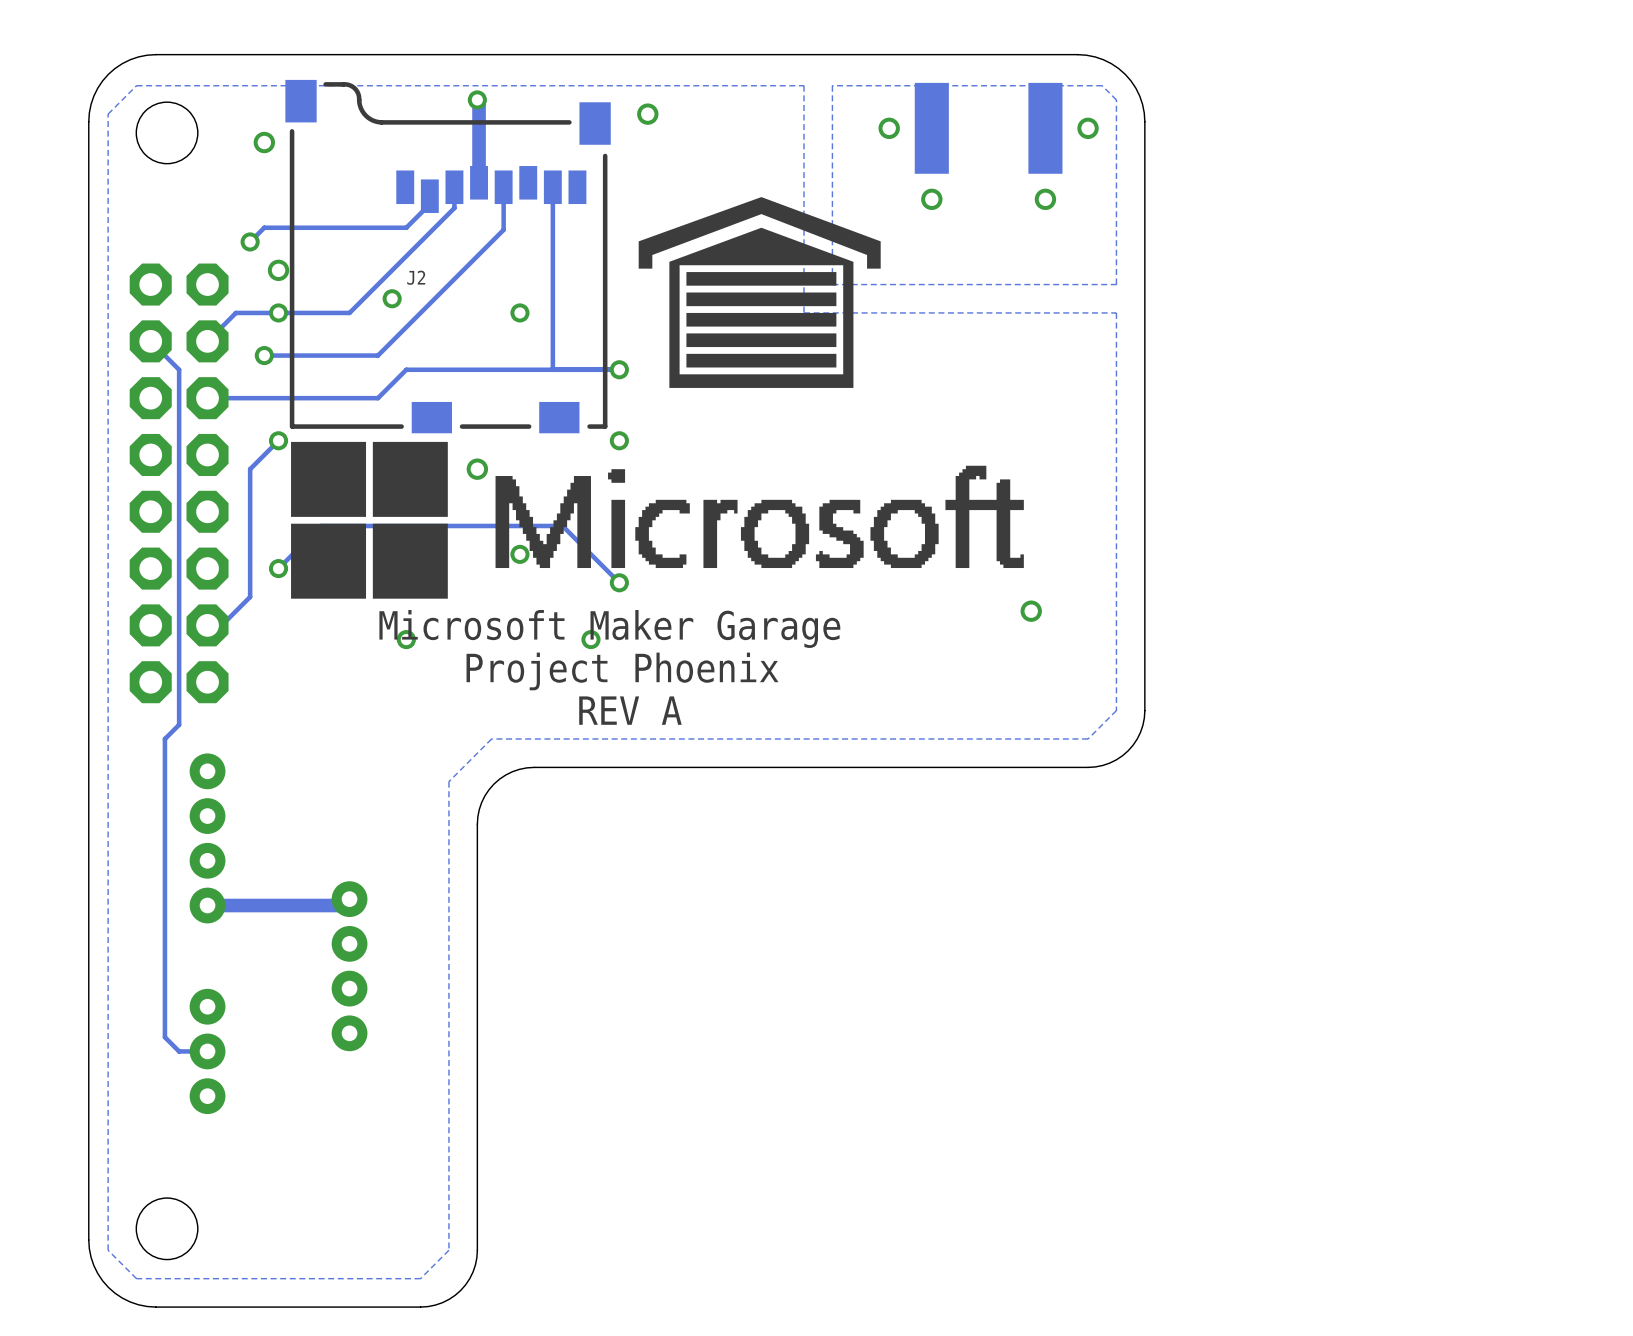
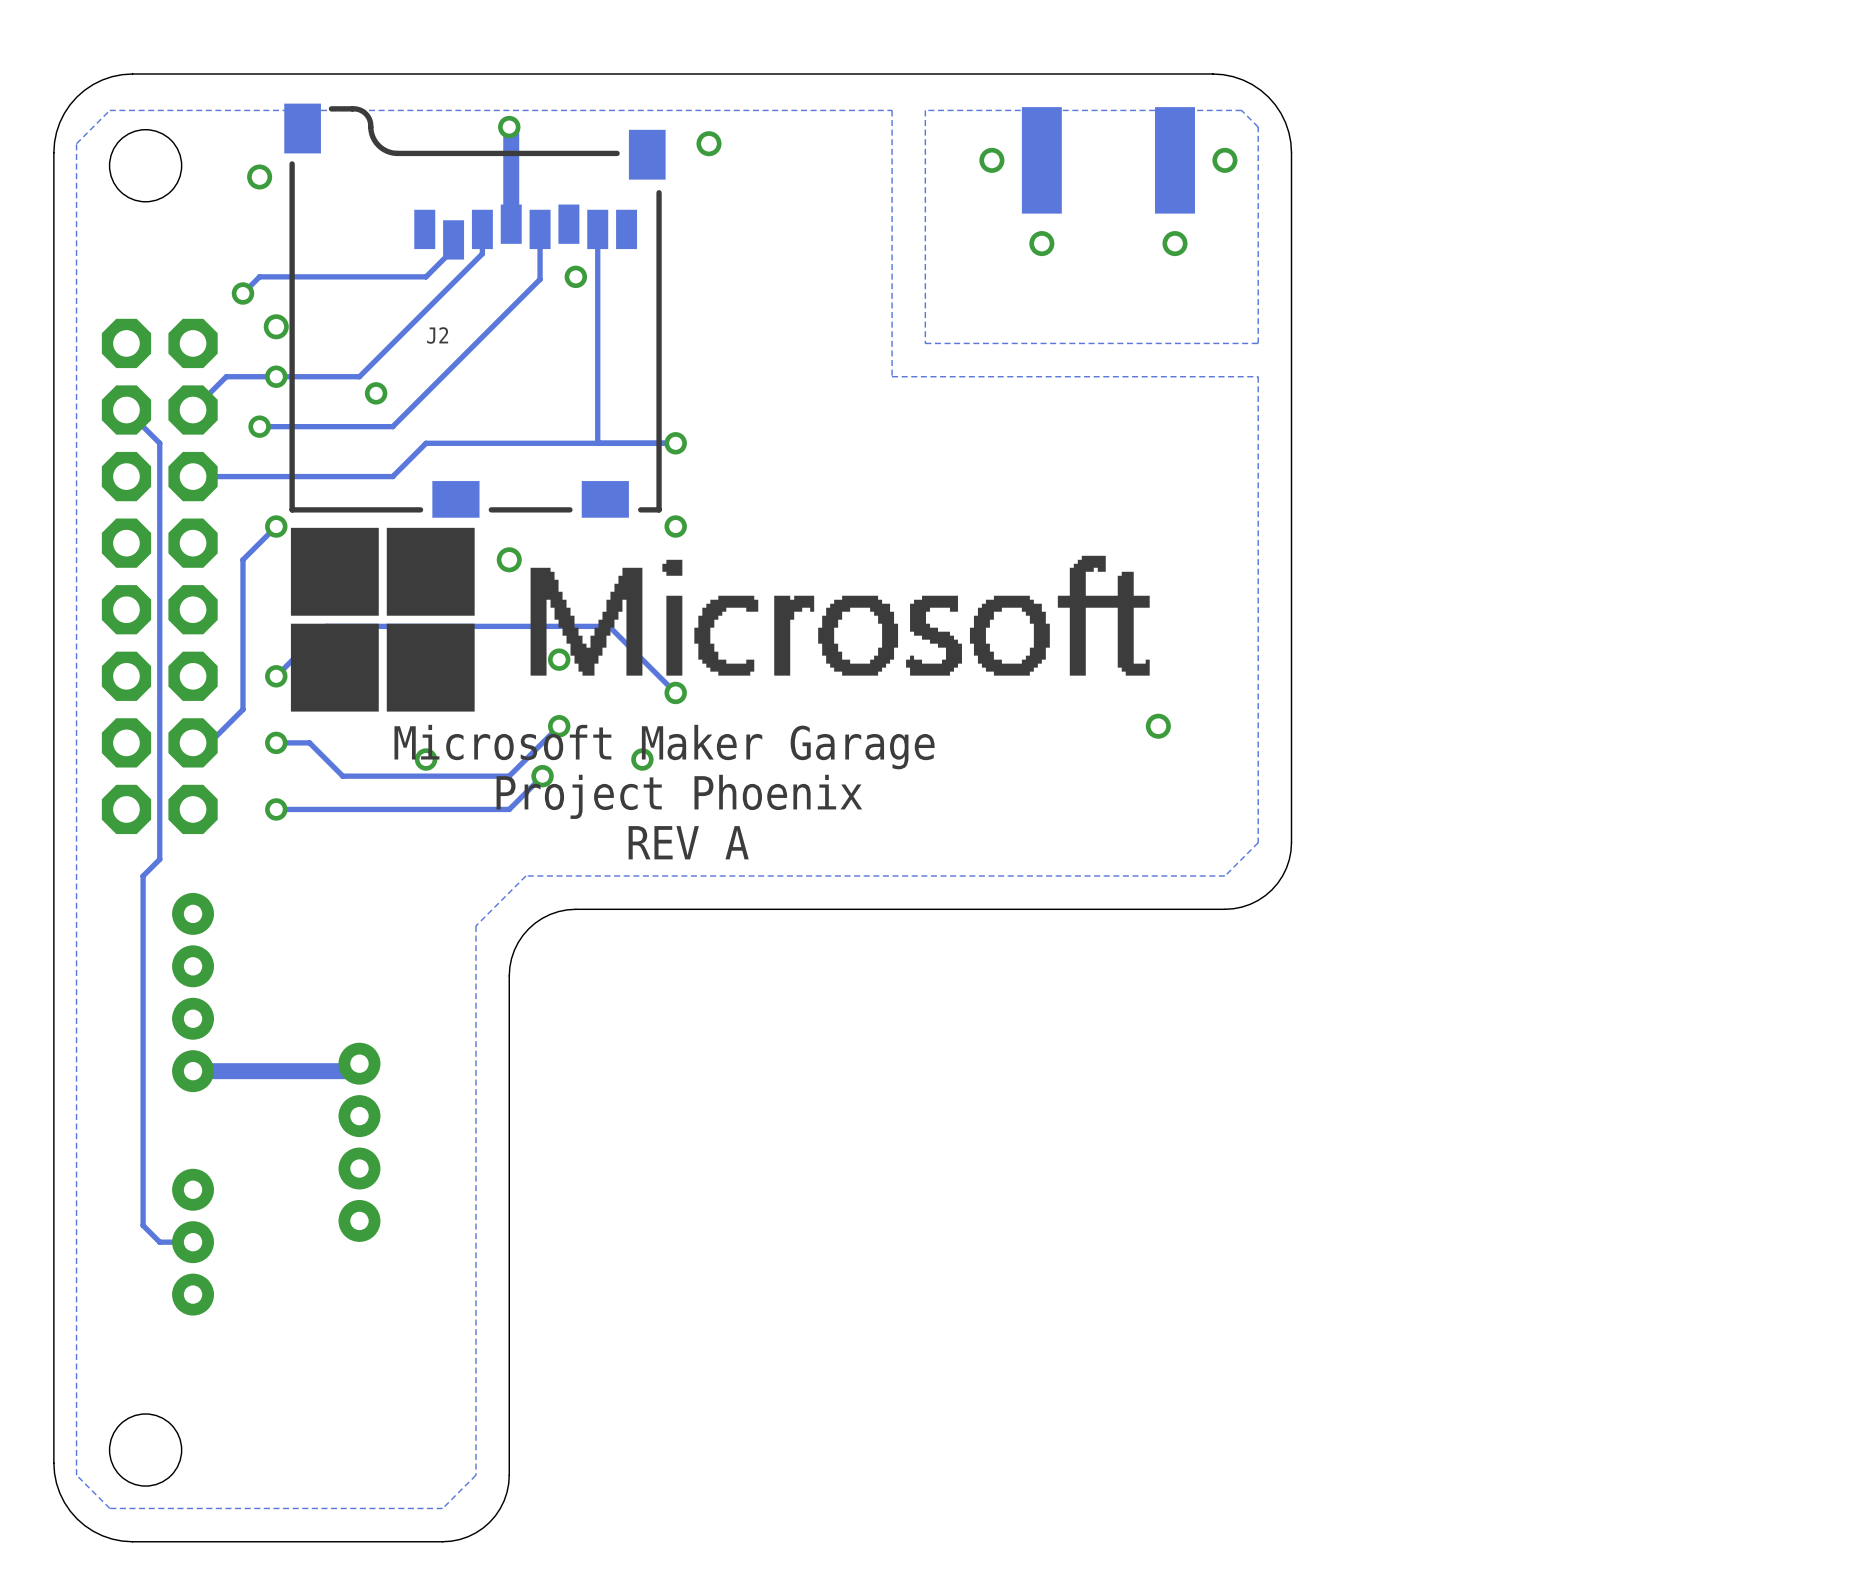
drawing: [638, 197, 881, 388] -> none
via: none -> (575, 276)
via position: (392, 298) -> (376, 393)
via: (519, 312) -> none
track: none -> (559, 726) (509, 776) (342, 776) (309, 742) (276, 742)
via: none -> (559, 726)
via: none -> (276, 742)
track: none -> (542, 776) (509, 809) (276, 809)
via: none -> (542, 776)
via: none -> (276, 809)

